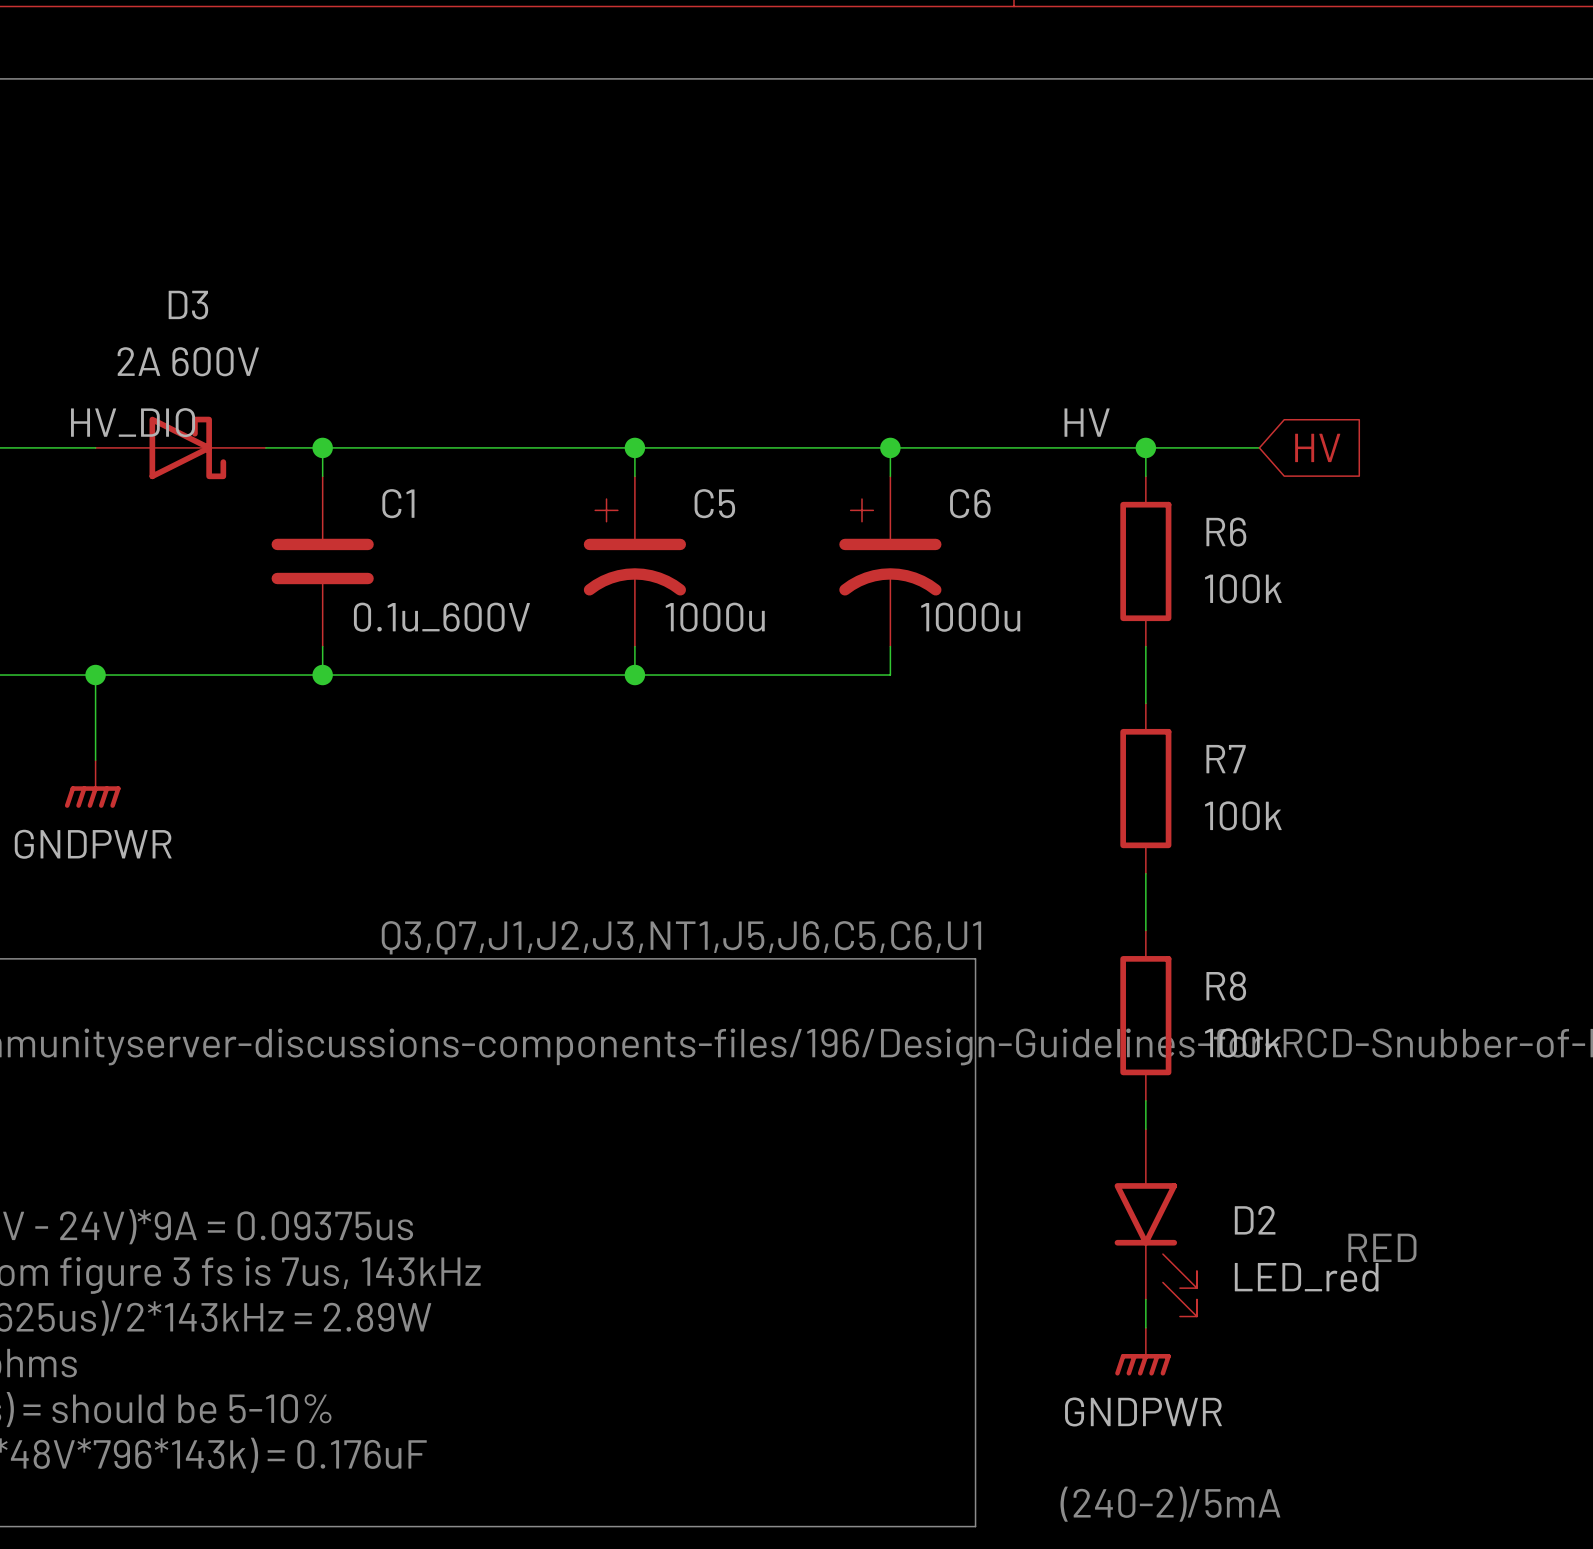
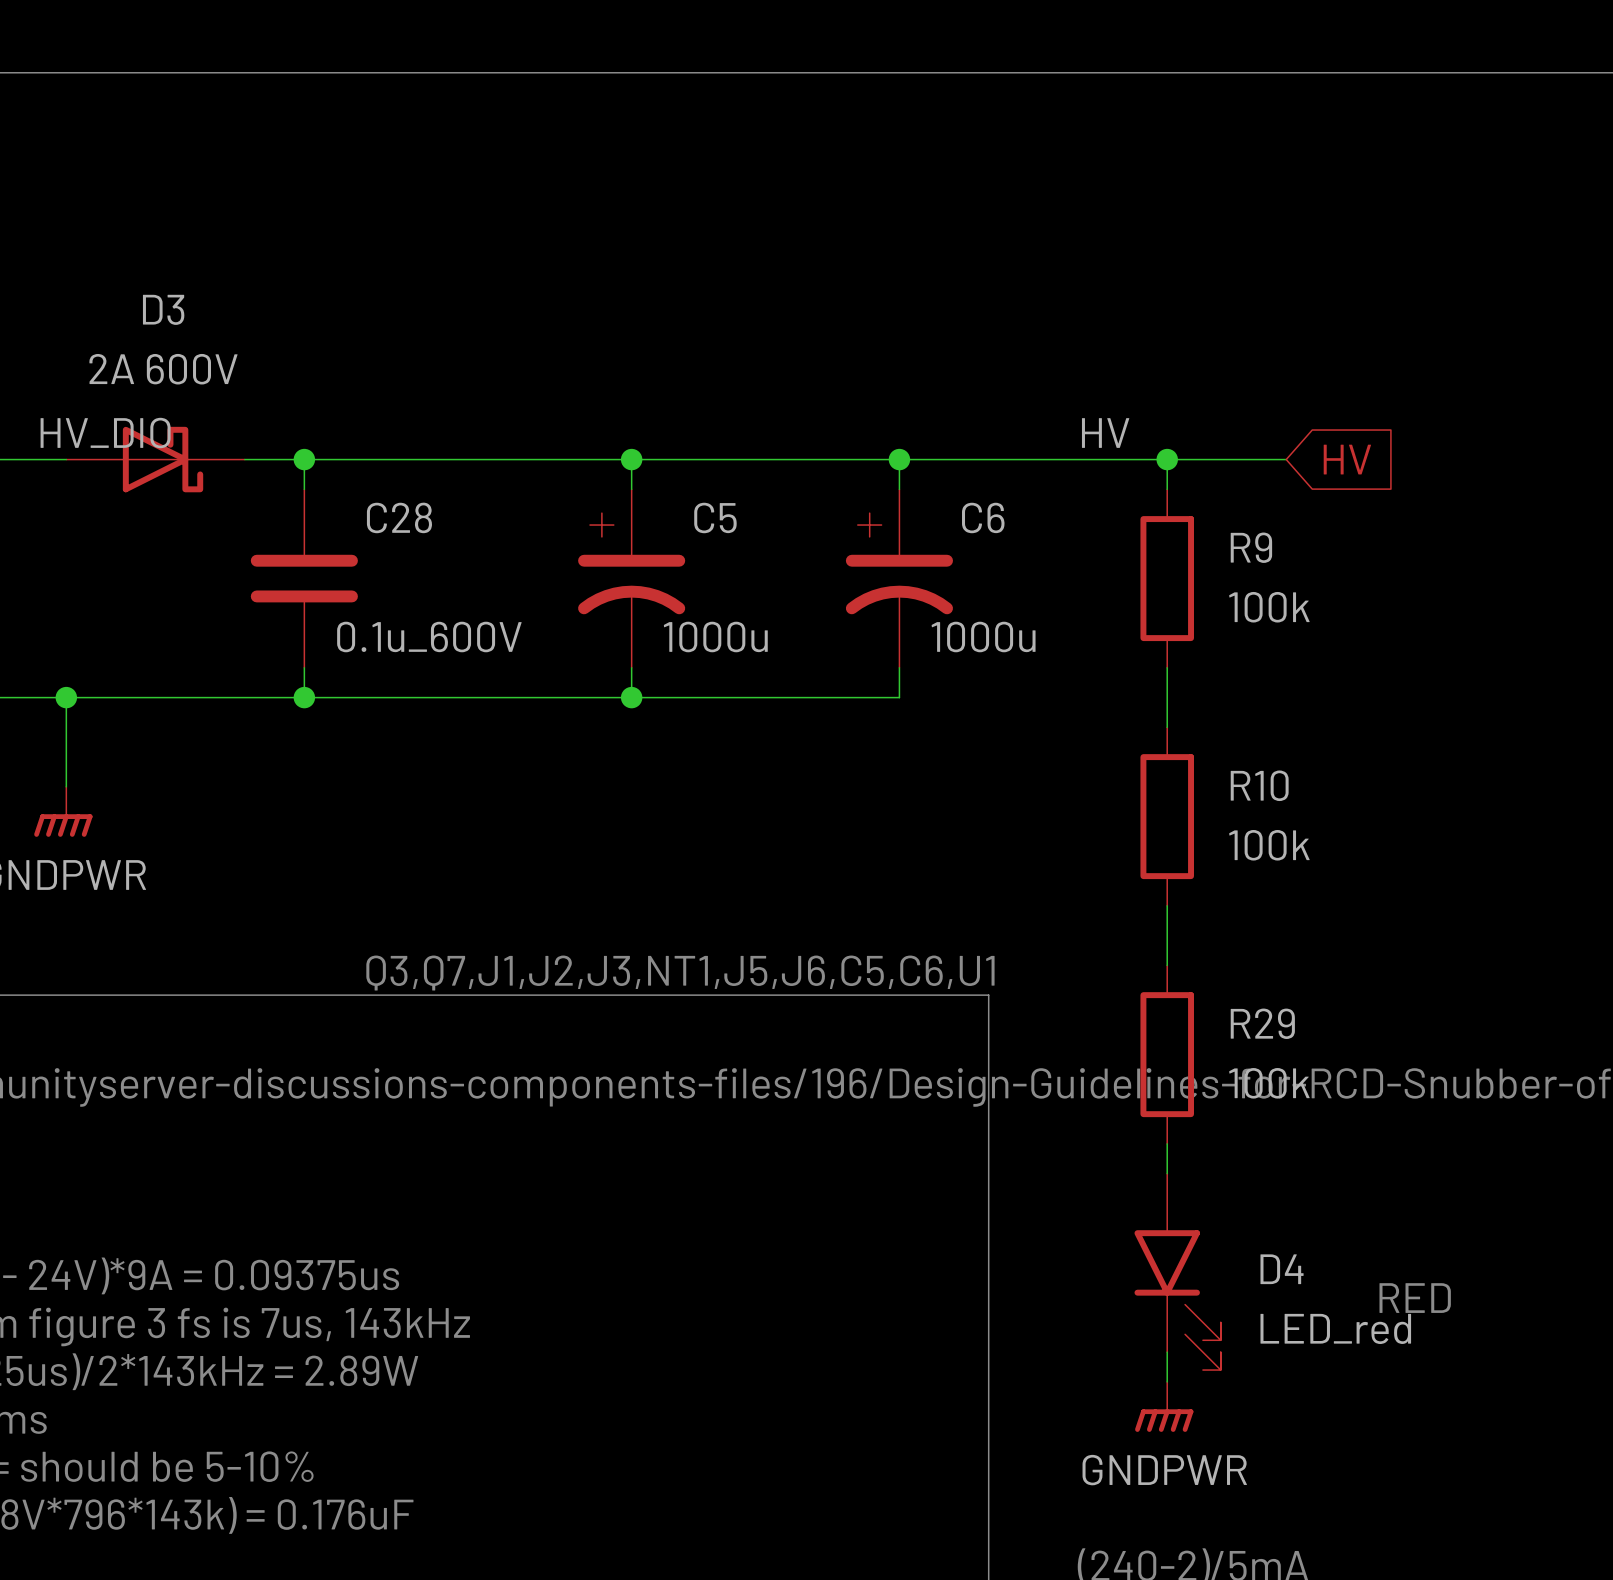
C1 name: C1 (398, 503) -> C28 (399, 517)
R6 name: R6 (1226, 532) -> R9 (1251, 547)
R7 name: R7 (1226, 759) -> R10 (1259, 785)
R8 name: R8 (1226, 986) -> R29 (1262, 1023)
D2 name: D2 (1255, 1220) -> D4 (1282, 1269)

